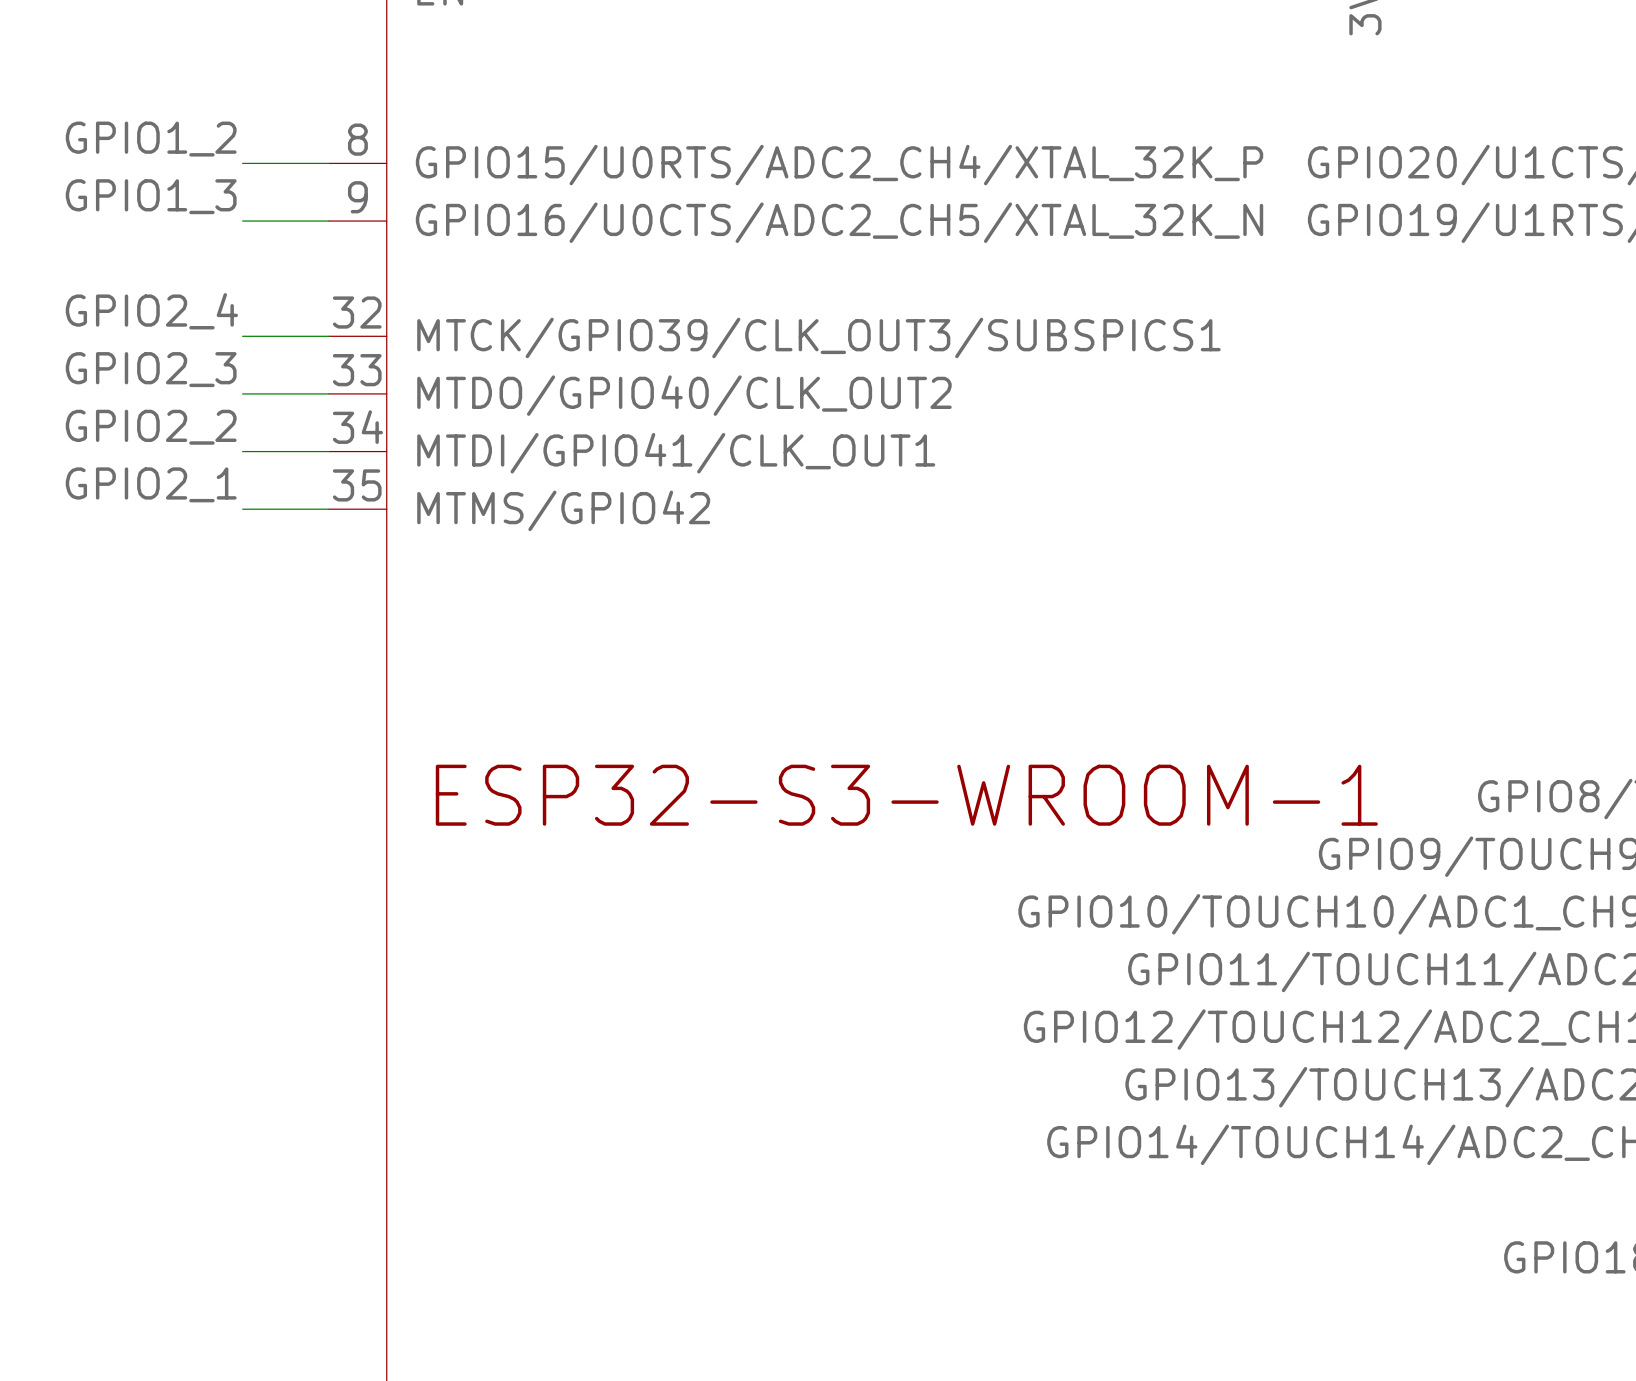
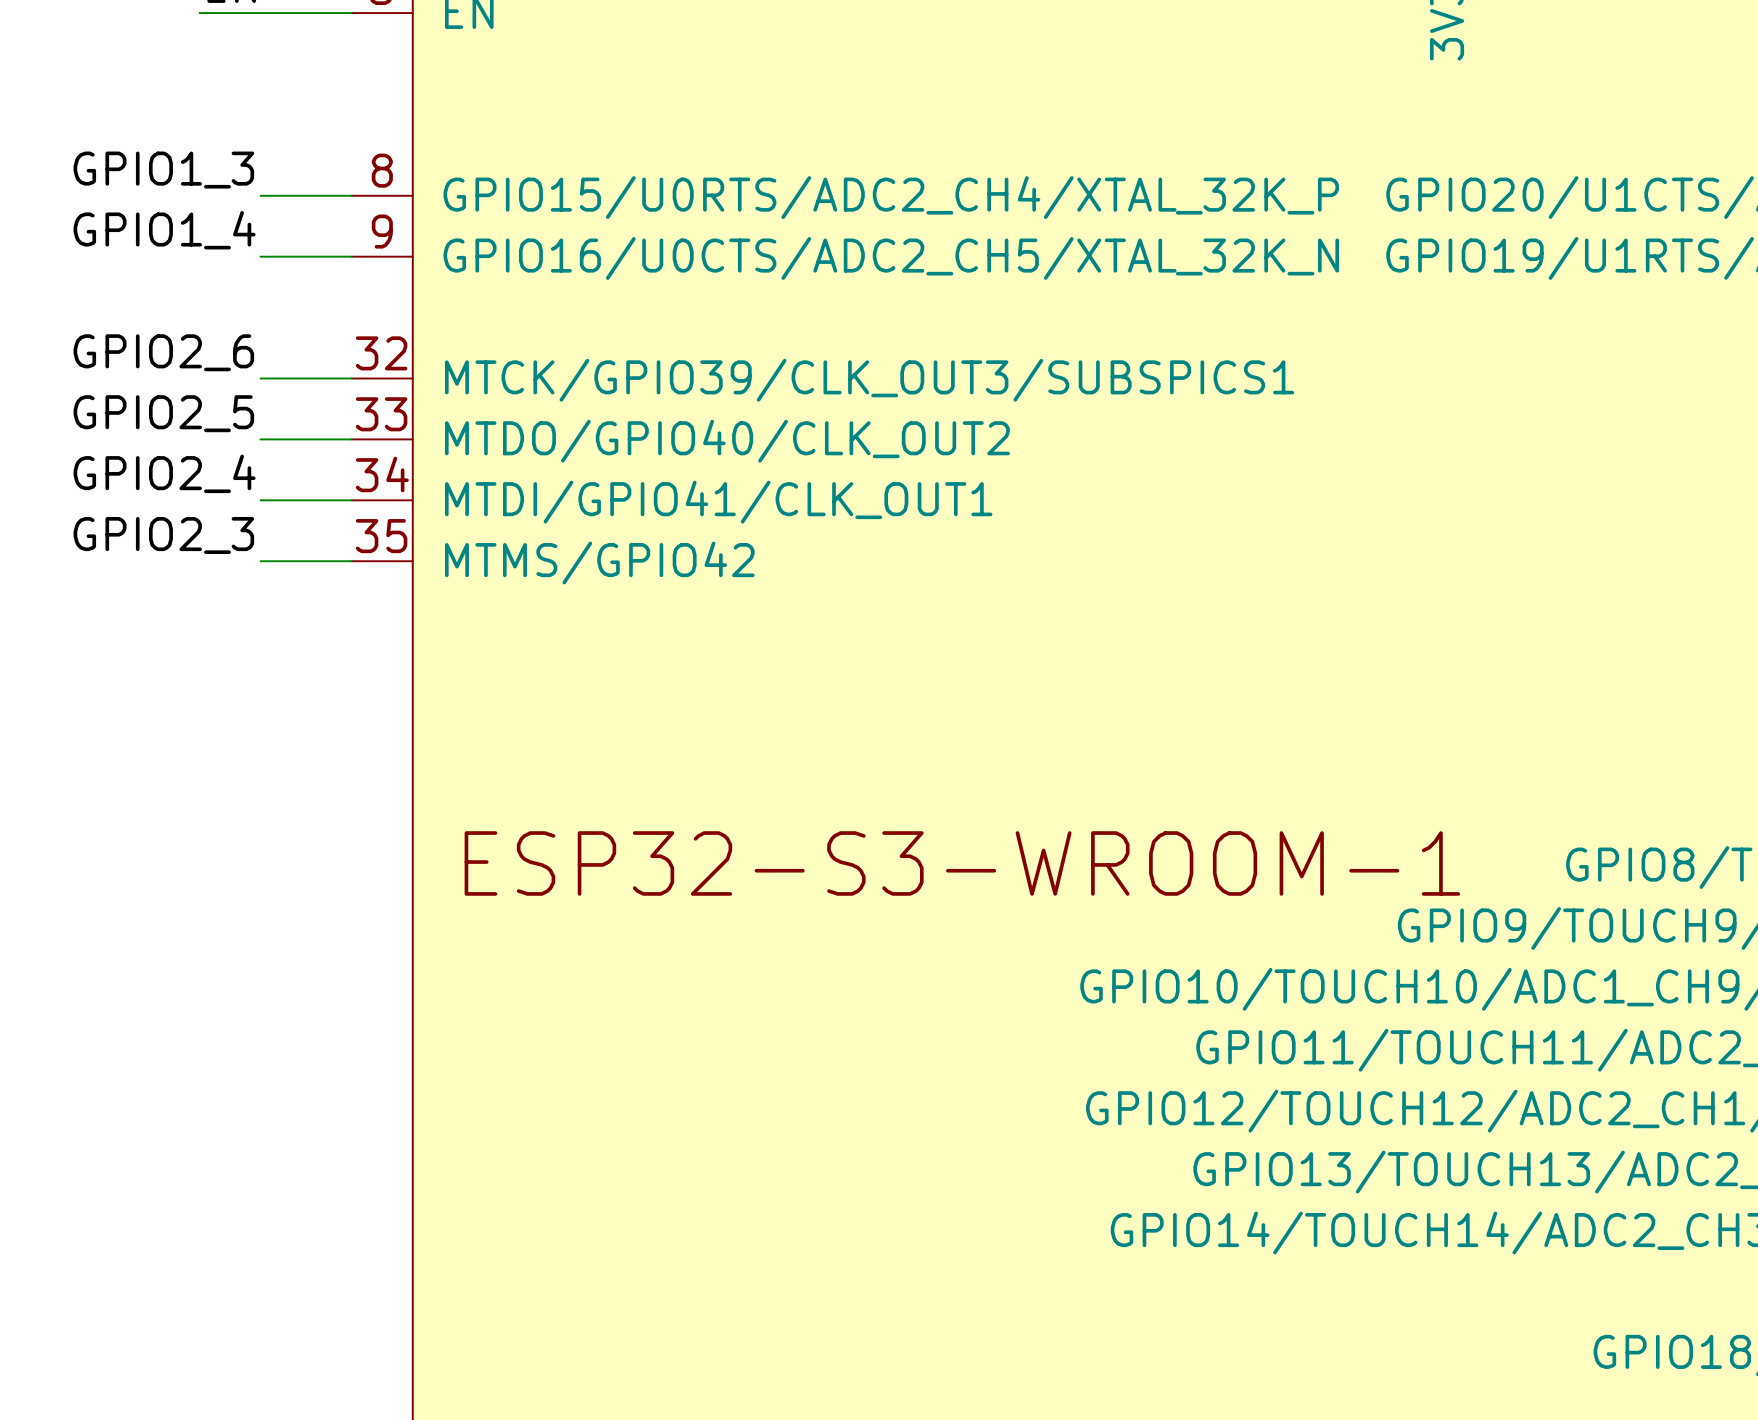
label: GPIO1_2 (151, 139) -> GPIO1_3 (163, 170)
label: GPIO1_3 (151, 196) -> GPIO1_4 (164, 230)
label: GPIO2_4 (151, 311) -> GPIO2_6 (163, 352)
label: GPIO2_3 (151, 369) -> GPIO2_5 (163, 413)
label: GPIO2_2 (151, 427) -> GPIO2_4 (164, 473)
label: GPIO2_1 (151, 484) -> GPIO2_3 (163, 535)

